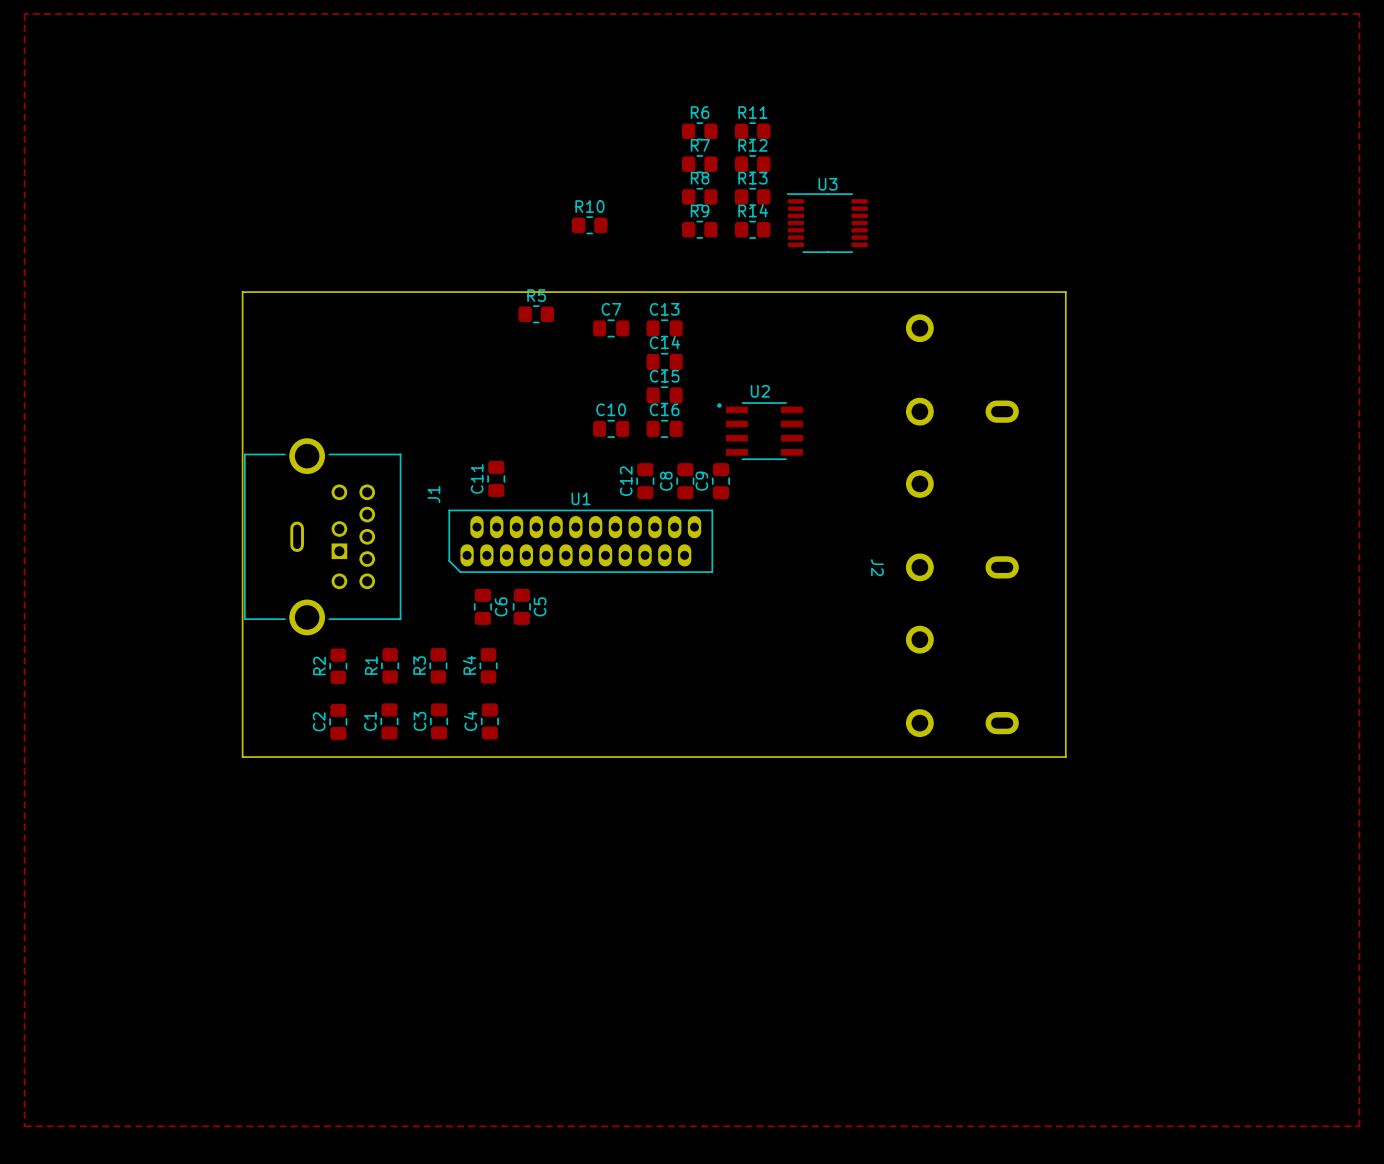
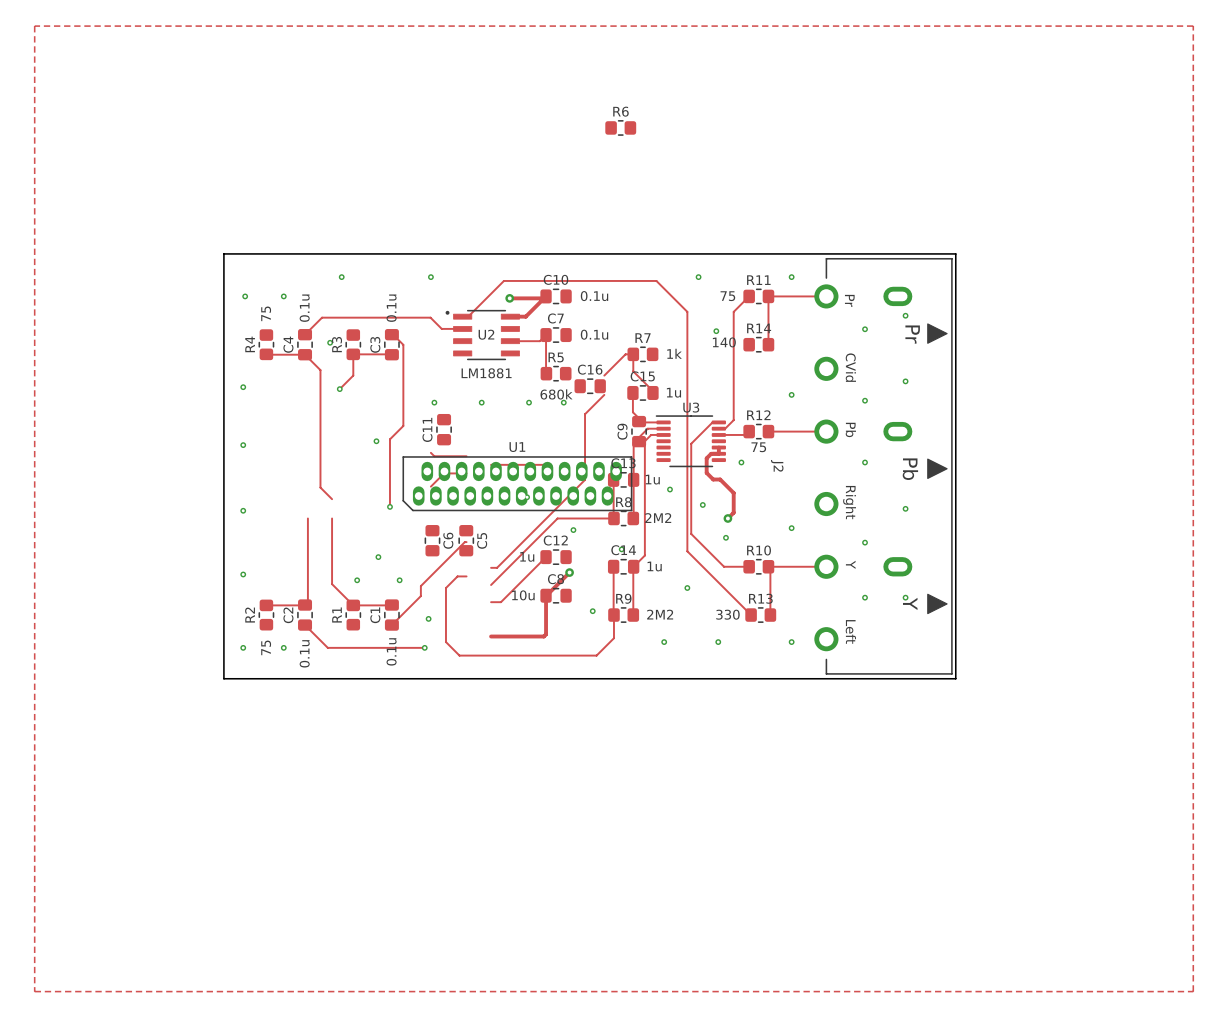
R11 position: (752, 131) -> (758, 296)
R7 position: (699, 164) -> (642, 354)
R12 position: (752, 164) -> (758, 431)
R8 position: (699, 196) -> (623, 518)
R13 position: (752, 196) -> (760, 615)
U3 position: (827, 223) -> (690, 441)
R10 position: (589, 225) -> (758, 566)
R9 position: (699, 229) -> (623, 615)
R14 position: (752, 229) -> (758, 344)
board edge: (242, 292) (1065, 292) (1065, 757) (242, 757) -> (223, 267) (223, 253) (955, 253) (955, 678) (223, 678) (223, 671)
via: none -> (341, 277)
via: none -> (430, 277)
via: none -> (698, 277)
via: none -> (791, 277)
R5 position: (536, 314) -> (556, 373)
J2 footprint: [905, 314, 1019, 738] -> [814, 258, 953, 675]
via: none -> (245, 296)
via: none -> (283, 296)
track: none -> (546, 296) (525, 316) (510, 316)
C10 value: none -> 0.1u (594, 296)
R11 value: none -> 75 (727, 296)
track: none -> (749, 296) (733, 311) (733, 420) (725, 428) (718, 428)
track: none -> (826, 296) (768, 296) (768, 344)
track: none -> (509, 298) (544, 298)
via: none -> (509, 298)
C7 position: (611, 328) -> (556, 335)
C13 position: (664, 328) -> (623, 479)
C4 value: none -> 0.1u (304, 308)
C3 value: none -> 0.1u (391, 308)
R4 value: none -> 75 (266, 313)
via: none -> (905, 315)
track: none -> (462, 316) (468, 316) (503, 280) (656, 280) (687, 311) (687, 551) (751, 615)
C14 position: (664, 361) -> (623, 566)
track: none -> (462, 328) (441, 328) (430, 317) (322, 317) (305, 334)
via: none -> (865, 329)
via: none -> (716, 331)
track: none -> (391, 334) (403, 344) (403, 425) (389, 439) (389, 506)
C7 value: none -> 0.1u (594, 334)
track: none -> (510, 341) (539, 341) (546, 335) (546, 373)
via: none -> (330, 342)
R14 value: none -> 140 (724, 342)
U2 name position: U2 (760, 391) -> U2 (486, 334)
R7 value: none -> 1k (674, 353)
track: none -> (266, 354) (305, 354) (320, 370) (320, 487) (332, 499)
track: none -> (391, 354) (353, 354) (353, 375) (339, 389)
C15 position: (664, 395) -> (642, 392)
U2 value: none -> LM1881 (486, 373)
track: none -> (604, 375) (625, 354) (633, 354) (633, 371) (652, 392)
via: none -> (905, 381)
C10 position: (611, 428) -> (556, 296)
via: none -> (243, 387)
U2 position: (759, 431) -> (482, 335)
via: none -> (339, 389)
track: none -> (632, 392) (632, 412) (643, 422) (663, 422)
C15 value: none -> 1u (673, 392)
R5 value: none -> 680k (556, 394)
track: none -> (604, 394) (585, 414) (585, 479) (497, 567) (491, 567)
via: none -> (791, 394)
via: none -> (865, 400)
via: none -> (434, 402)
via: none -> (481, 402)
via: none -> (529, 402)
via: none -> (563, 402)
track: none -> (718, 422) (712, 422) (691, 443) (691, 533) (724, 566) (749, 566)
track: none -> (663, 428) (647, 428) (633, 442) (633, 518)
C12 rotation: 0° (645, 481) -> 90° clockwise (556, 557)
C12 position: (645, 481) -> (556, 557)
C8 rotation: 0° (685, 481) -> 90° clockwise (556, 595)
C8 position: (685, 481) -> (556, 595)
track: none -> (749, 431) (745, 434) (718, 434)
track: none -> (768, 431) (826, 431)
track: none -> (663, 434) (651, 434) (644, 441) (644, 555) (633, 567) (633, 615)
via: none -> (376, 441)
via: none -> (243, 445)
track: none -> (718, 447) (718, 453) (711, 453) (706, 458) (706, 472) (713, 479) (720, 479) (733, 493) (733, 512) (727, 518)
R12 value: none -> 75 (758, 447)
track: none -> (430, 452) (434, 456) (466, 456)
via: none -> (741, 462)
via: none -> (865, 462)
track: none -> (546, 464) (491, 464)
track: none -> (466, 473) (444, 473) (430, 486)
J1: (322, 536) -> none
track: none -> (613, 479) (613, 518) (557, 518) (491, 585)
C13 value: none -> 1u (652, 479)
via: none -> (669, 489)
via: none -> (527, 497)
via: none -> (702, 504)
via: none -> (389, 506)
J2 name position: J2 (877, 567) -> J2 (777, 465)
via: none -> (905, 508)
via: none -> (243, 510)
R8 value: none -> 2M2 (658, 518)
track: none -> (307, 518) (307, 602) (304, 605) (266, 605)
track: none -> (332, 518) (332, 584) (353, 605) (391, 605)
via: none -> (727, 518)
via: none -> (791, 528)
via: none -> (573, 530)
via: none -> (725, 537)
track: none -> (466, 542) (420, 586) (420, 596) (391, 625)
via: none -> (865, 542)
via: none -> (621, 549)
via: none -> (378, 557)
C12 value: none -> 1u (527, 556)
track: none -> (546, 557) (500, 602) (491, 602)
track: none -> (613, 566) (613, 638) (596, 655) (459, 655) (445, 642) (445, 588) (457, 576) (466, 576)
C14 value: none -> 1u (654, 566)
track: none -> (826, 566) (768, 566) (770, 568) (770, 615)
track: none -> (569, 572) (546, 595) (546, 634) (543, 636) (491, 636)
via: none -> (569, 572)
via: none -> (243, 574)
via: none -> (357, 580)
via: none -> (399, 580)
via: none -> (687, 588)
R1 position: (390, 665) -> (353, 615)
R3 position: (438, 665) -> (353, 344)
R4 position: (488, 665) -> (266, 344)
R2 position: (338, 666) -> (266, 615)
C8 value: none -> 10u (523, 595)
via: none -> (865, 597)
via: none -> (905, 597)
via: none -> (592, 611)
R9 value: none -> 2M2 (660, 614)
R13 value: none -> 330 (727, 614)
via: none -> (428, 618)
track: none -> (305, 625) (327, 647) (424, 647)
C2 position: (338, 721) -> (305, 615)
C1 position: (389, 721) -> (391, 615)
C3 position: (439, 721) -> (391, 344)
C4 position: (489, 721) -> (305, 344)
via: none -> (664, 642)
via: none -> (718, 642)
via: none -> (791, 642)
via: none -> (243, 647)
R2 value: none -> 75 (266, 647)
via: none -> (283, 647)
via: none -> (424, 647)
C1 value: none -> 0.1u (391, 651)
C2 value: none -> 0.1u (304, 653)

